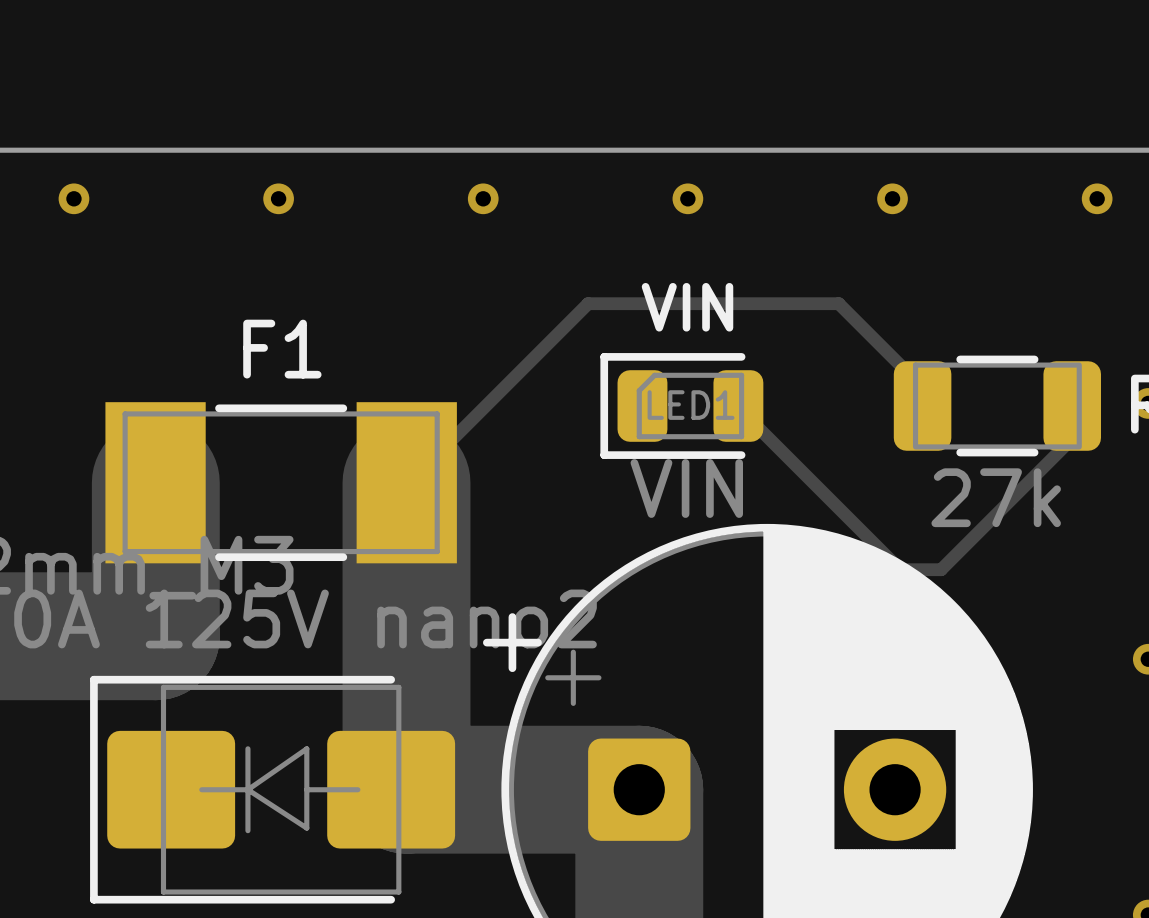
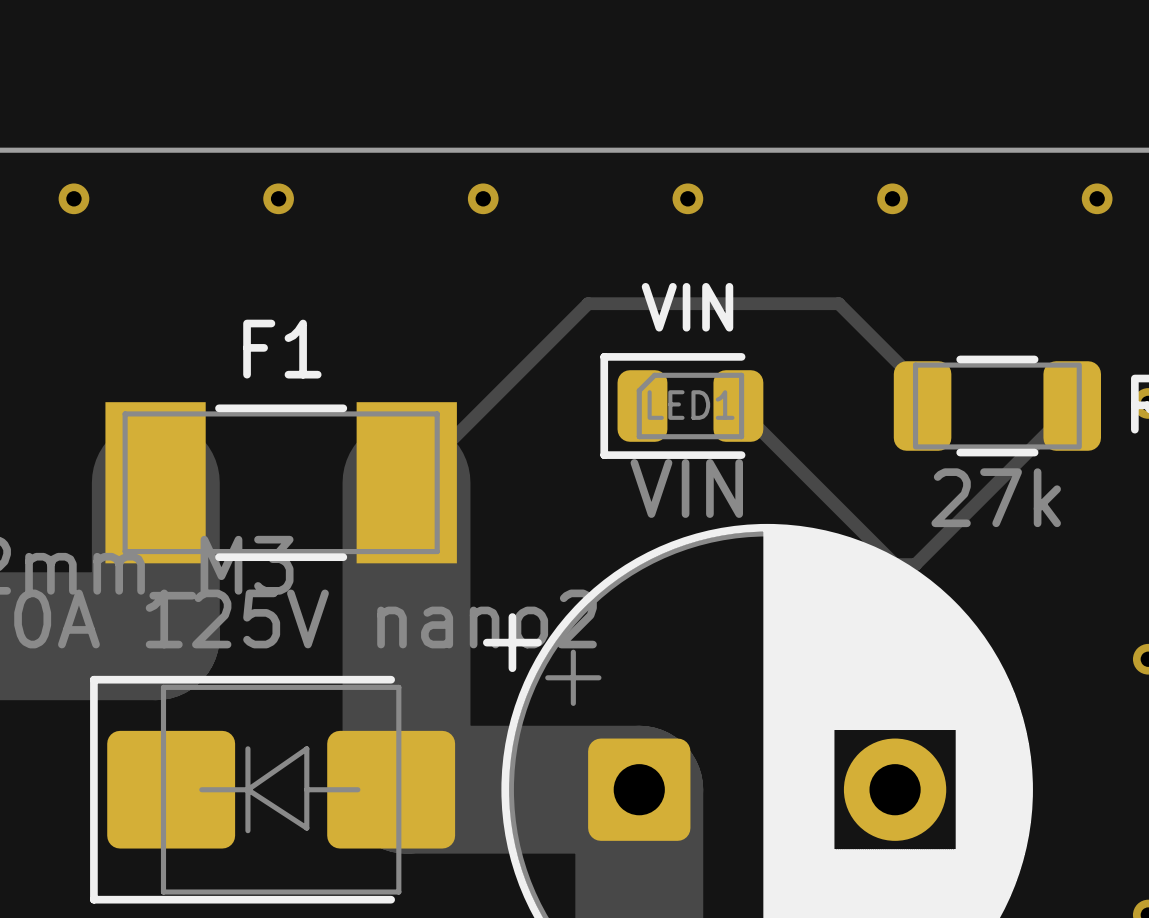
track: (1074, 436) (941, 569) (900, 569) (895, 564) -> (1074, 406) (915, 564) (895, 564)

